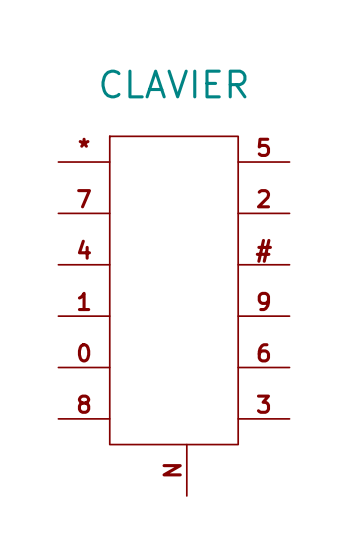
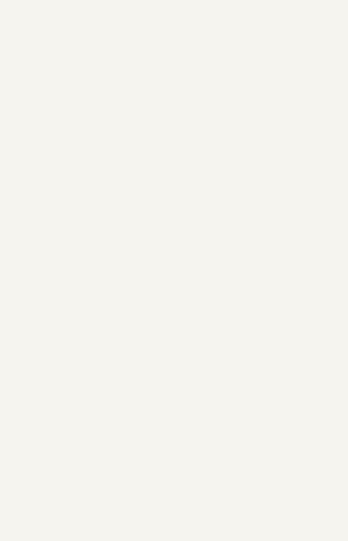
CLAVIER: (173, 316) -> none

